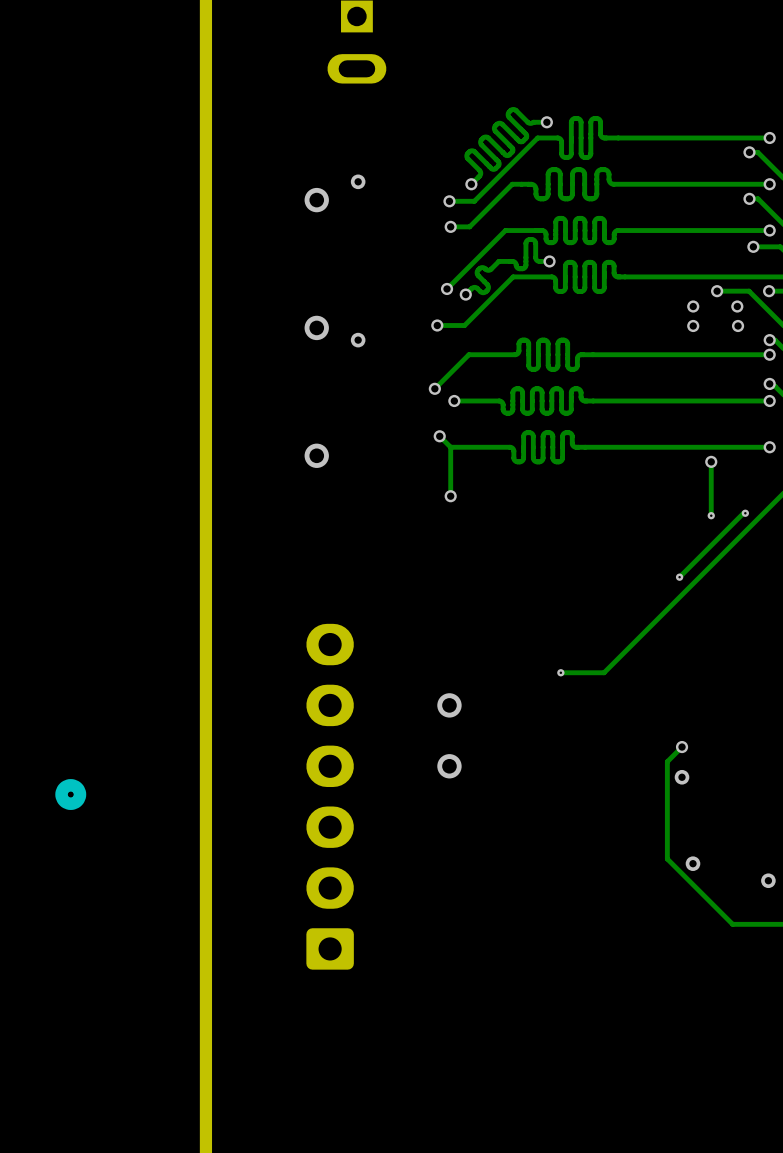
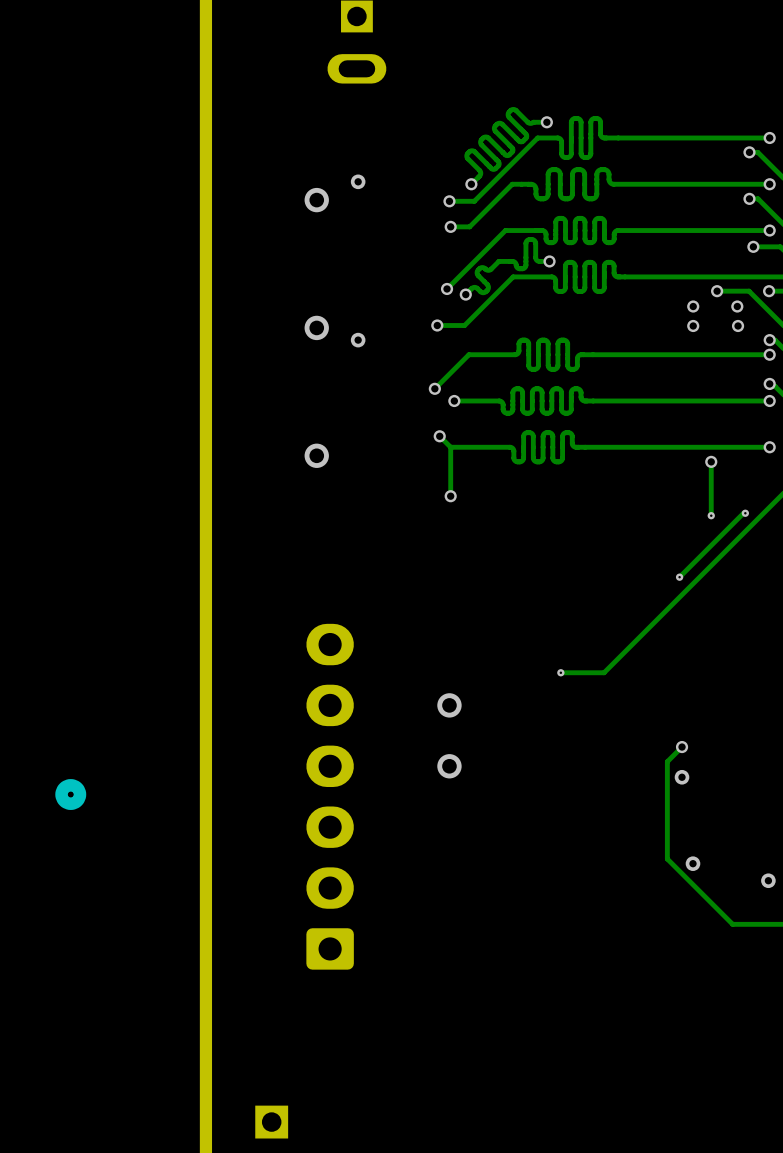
part: none -> (271, 1122)

